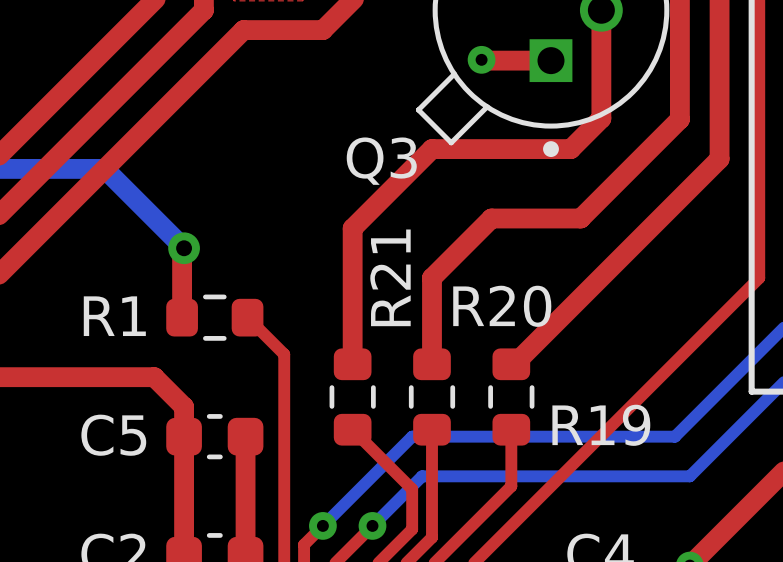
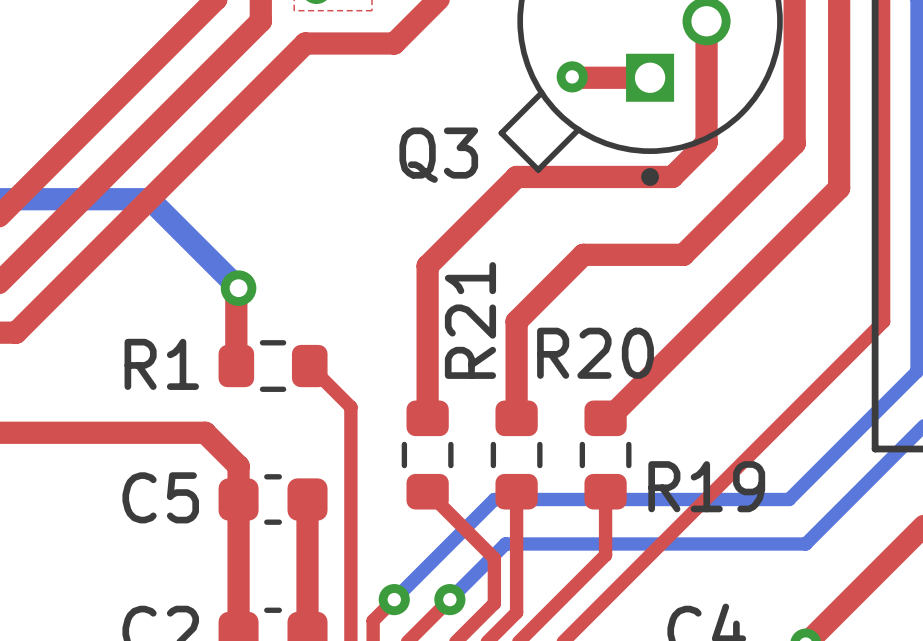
Q3 name position: Q3 (381, 161) -> Q3 (438, 155)

